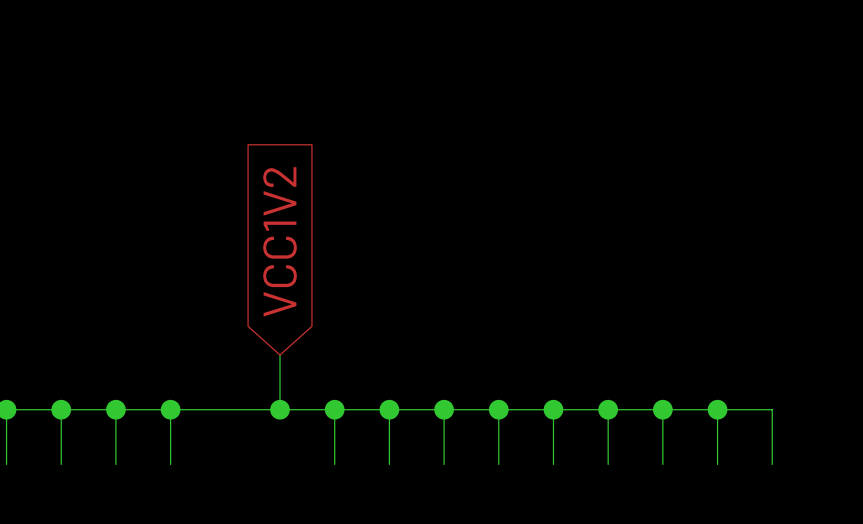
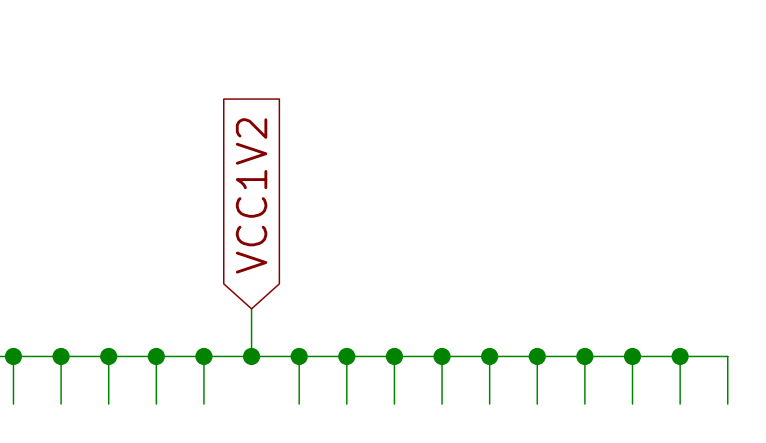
wire: none -> (203, 356) (203, 404)
junction: none -> (203, 356)
wire: none -> (680, 356) (727, 356) (727, 404)
junction: none -> (680, 356)

